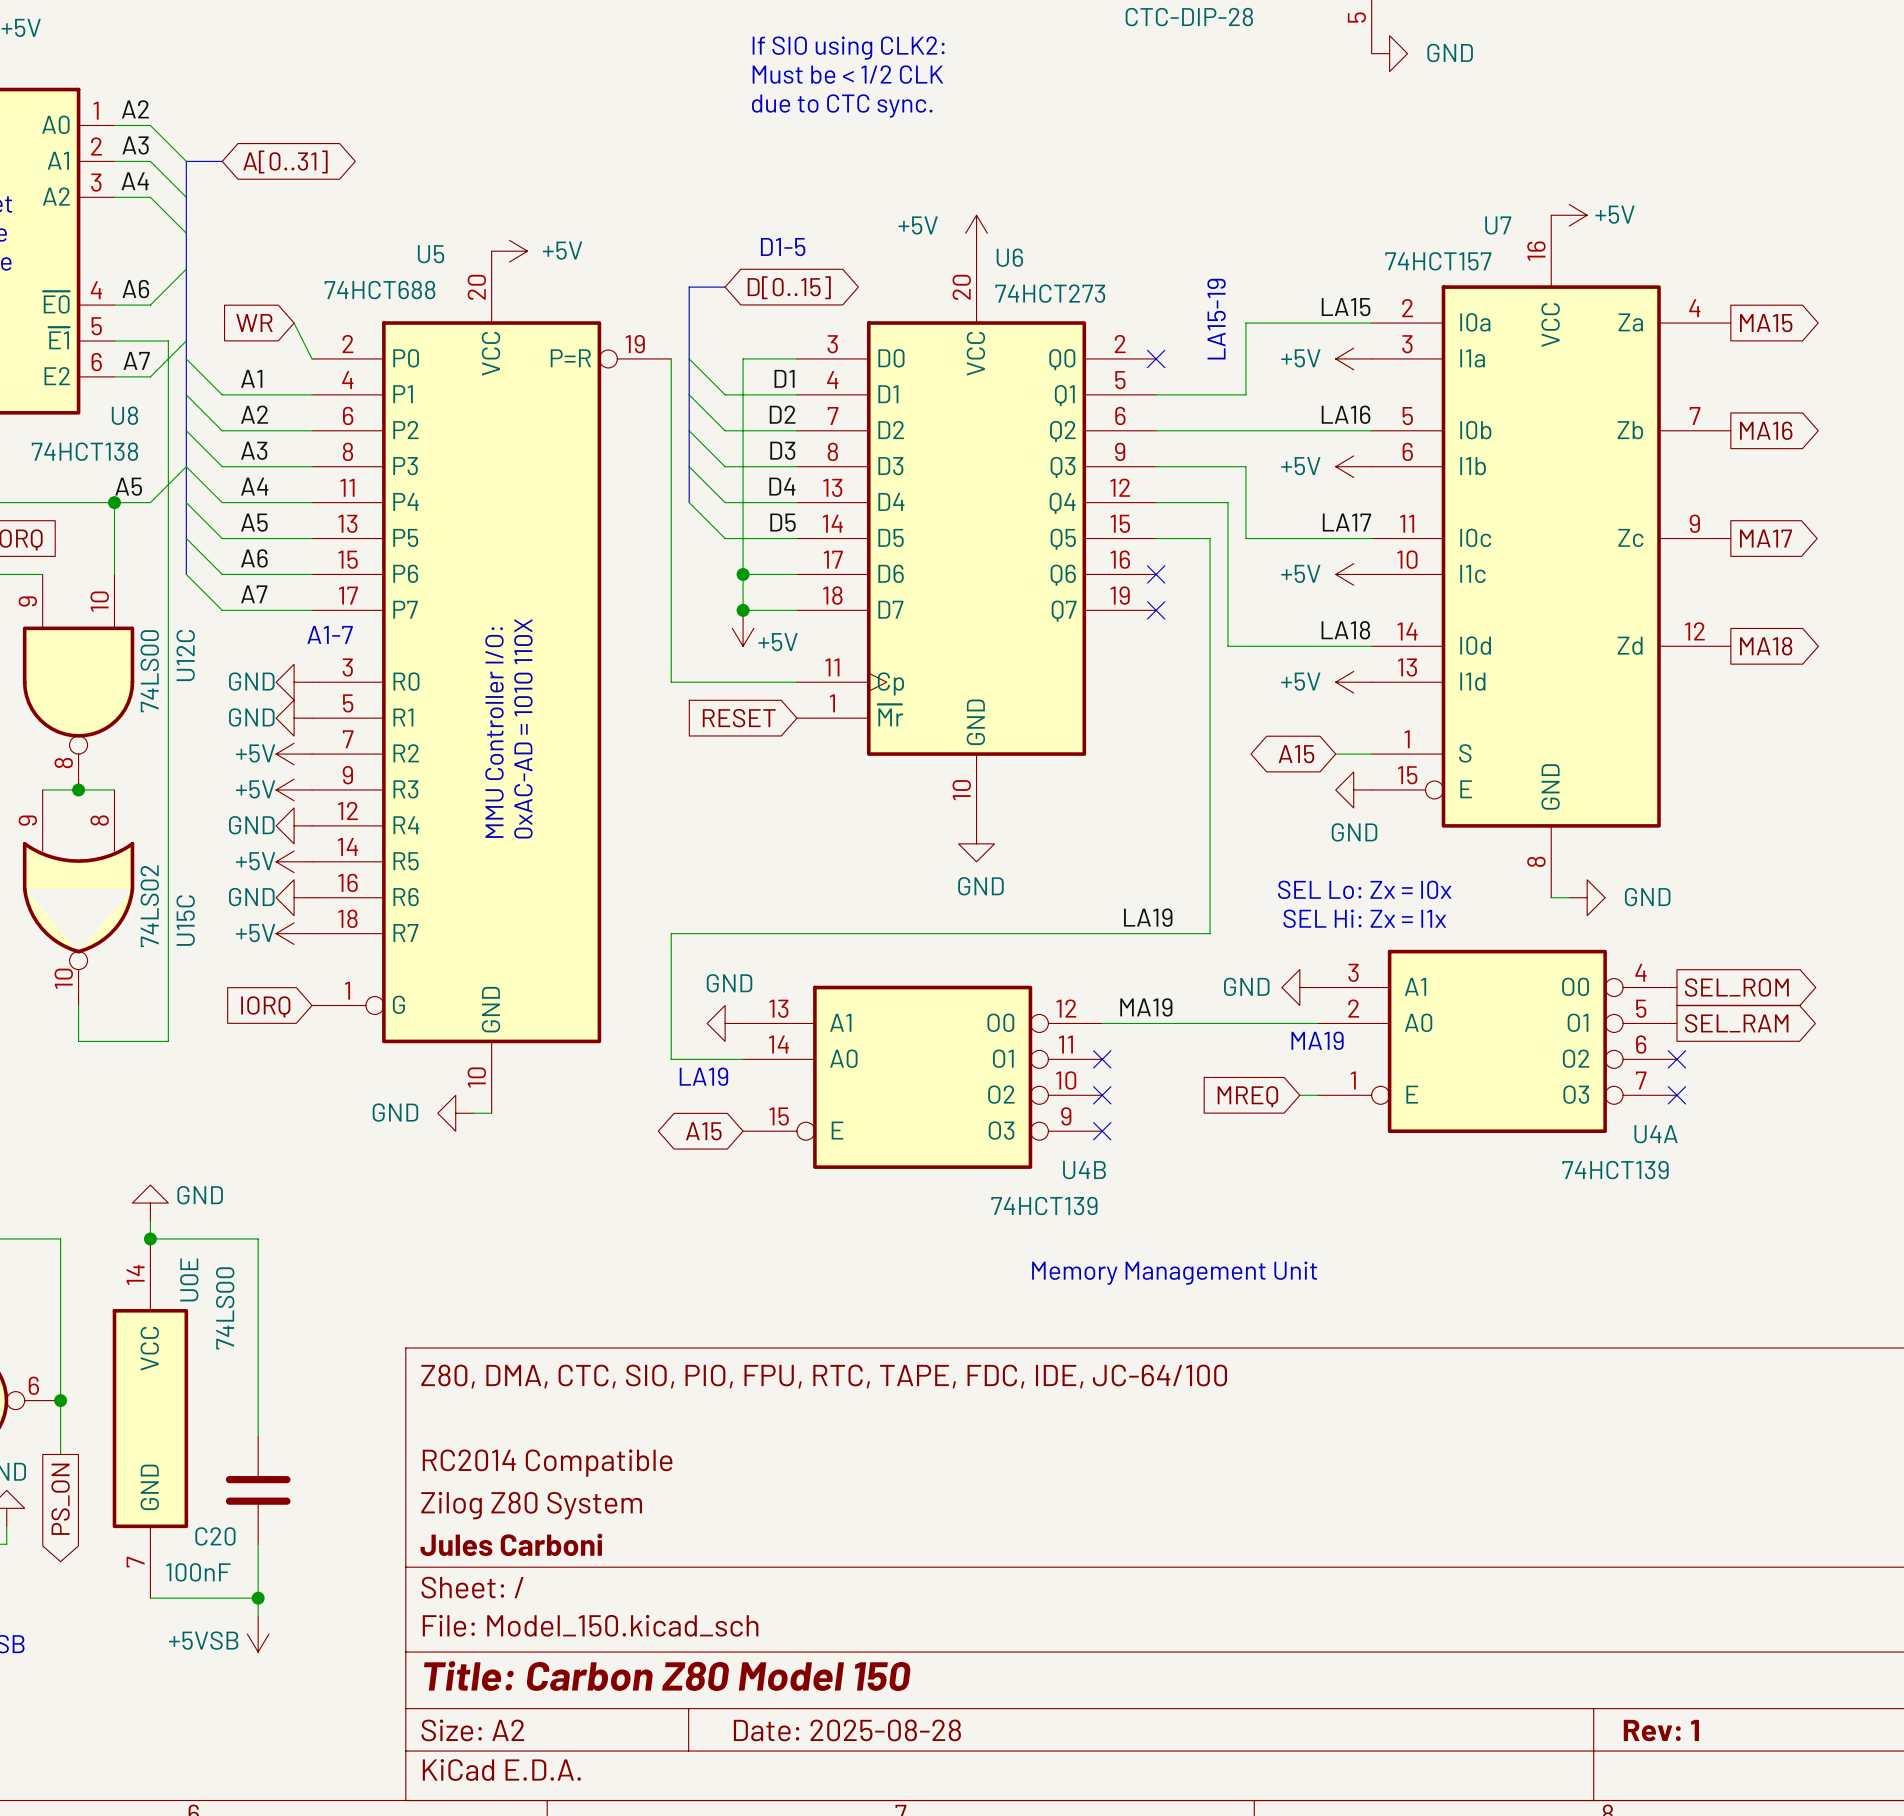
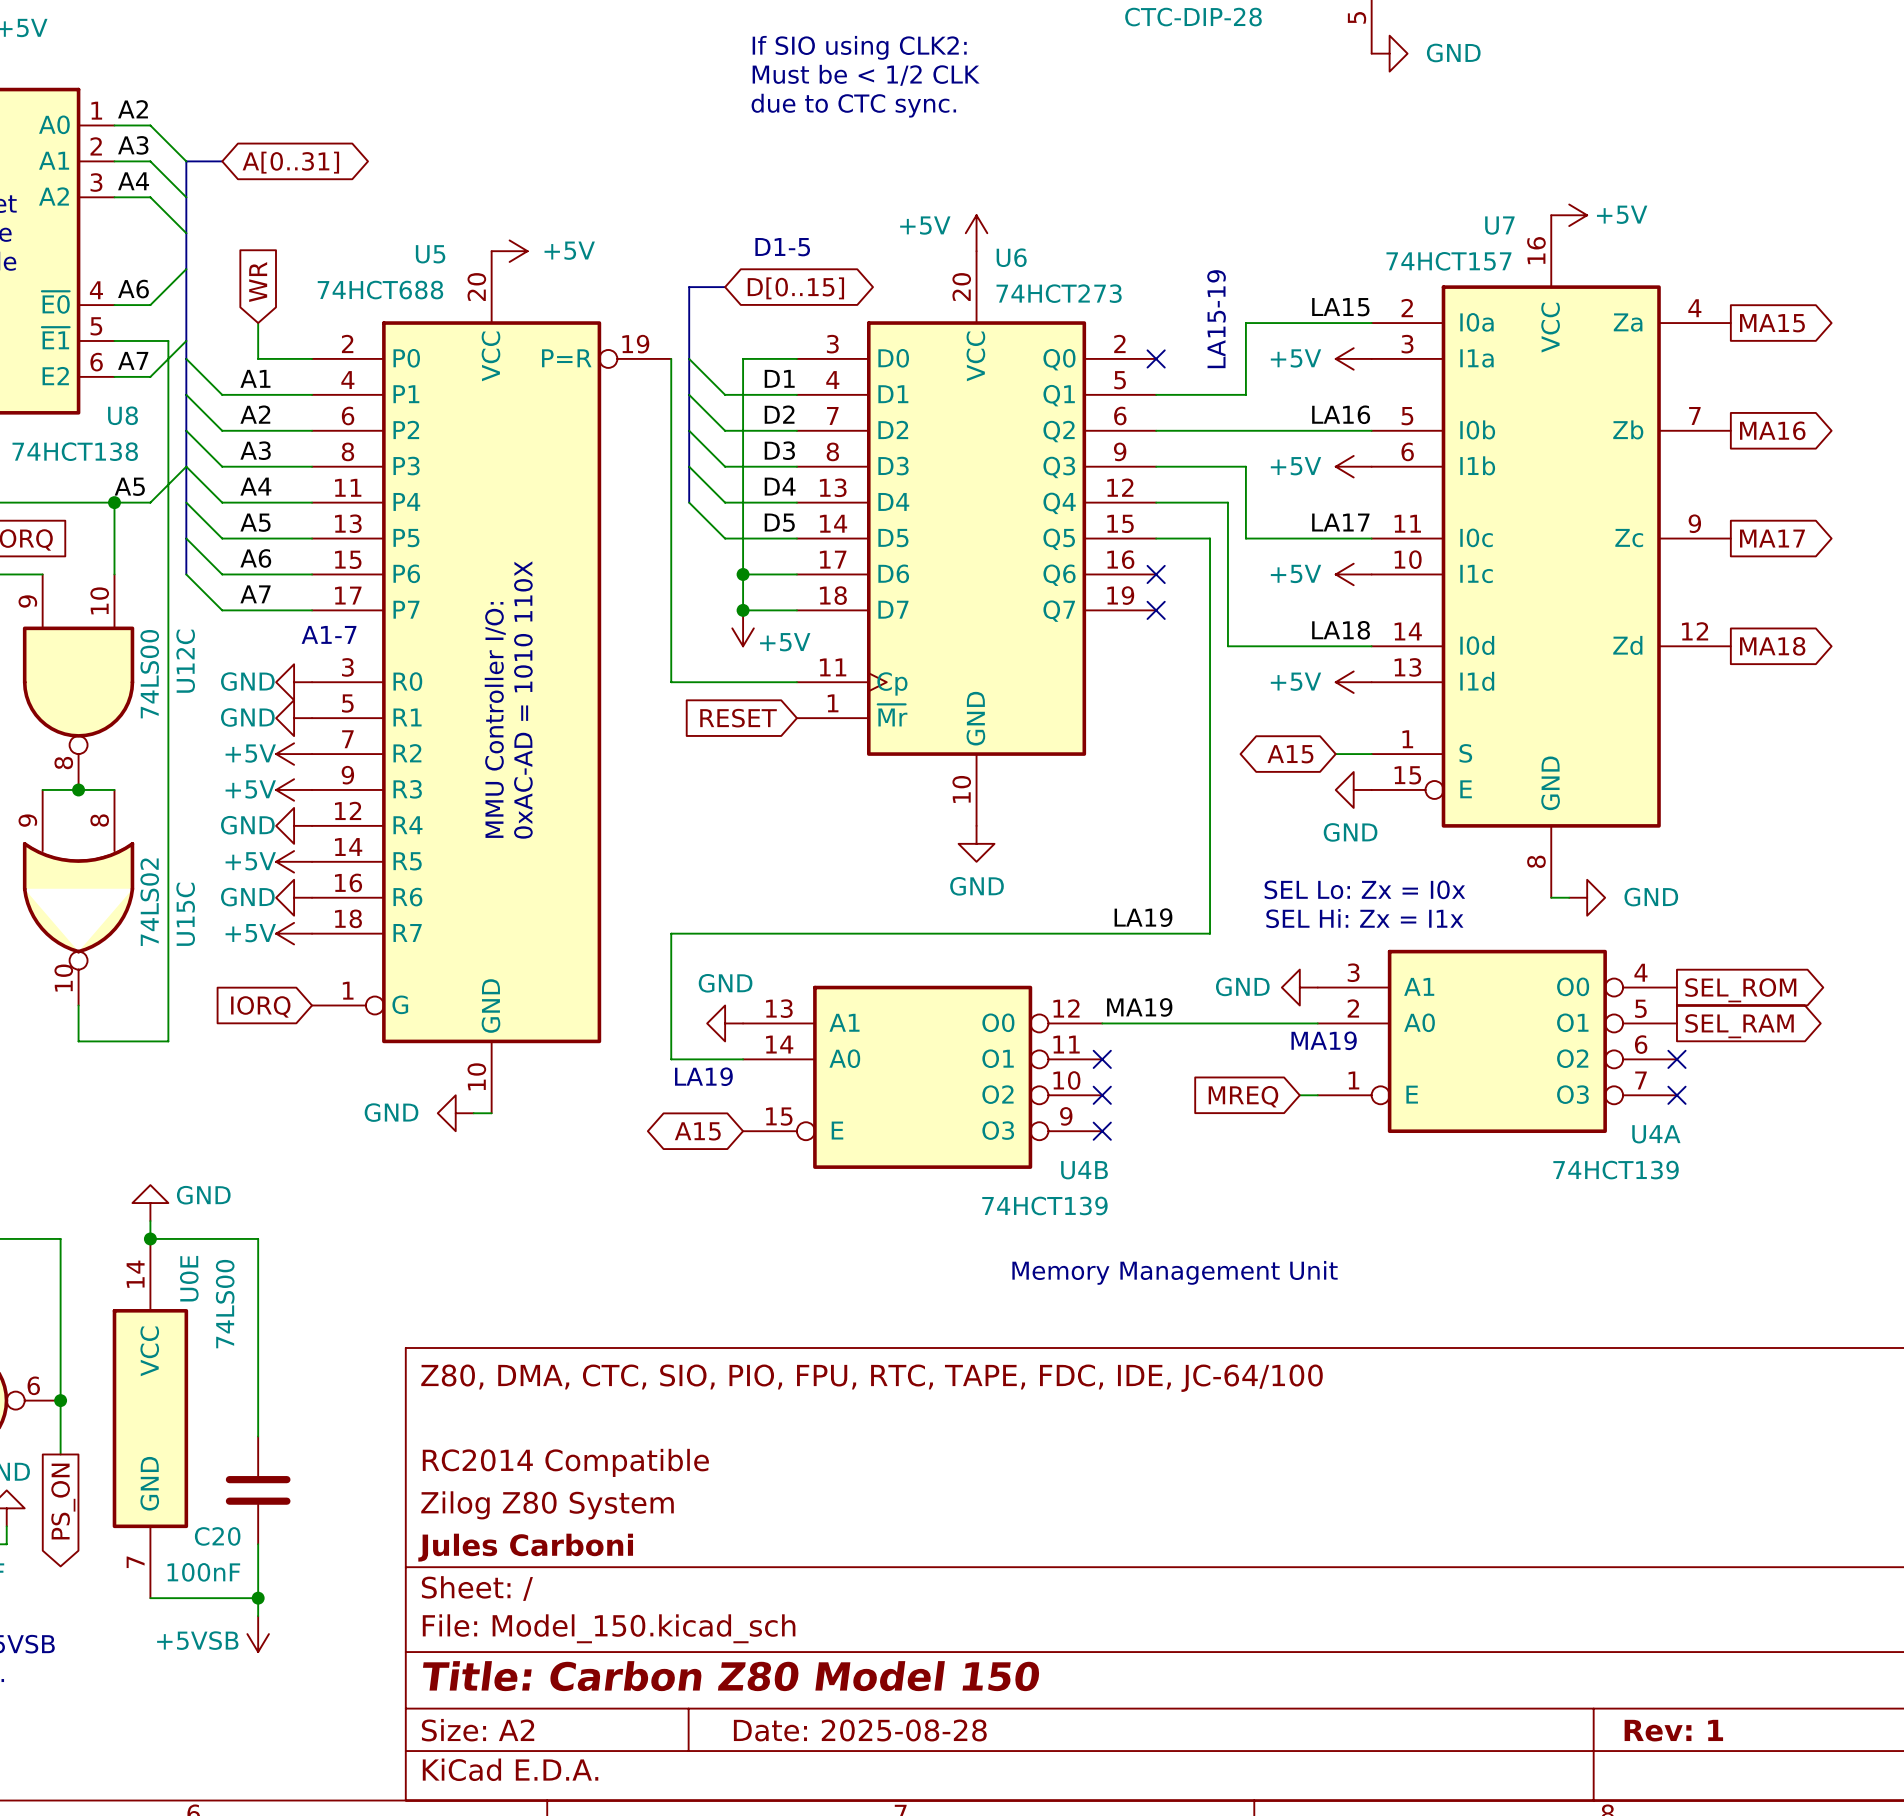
global label rotation: 0° (254, 323) -> 90° clockwise (258, 282)
wire: (294, 323) (312, 358) -> (258, 323) (258, 358) (312, 358)

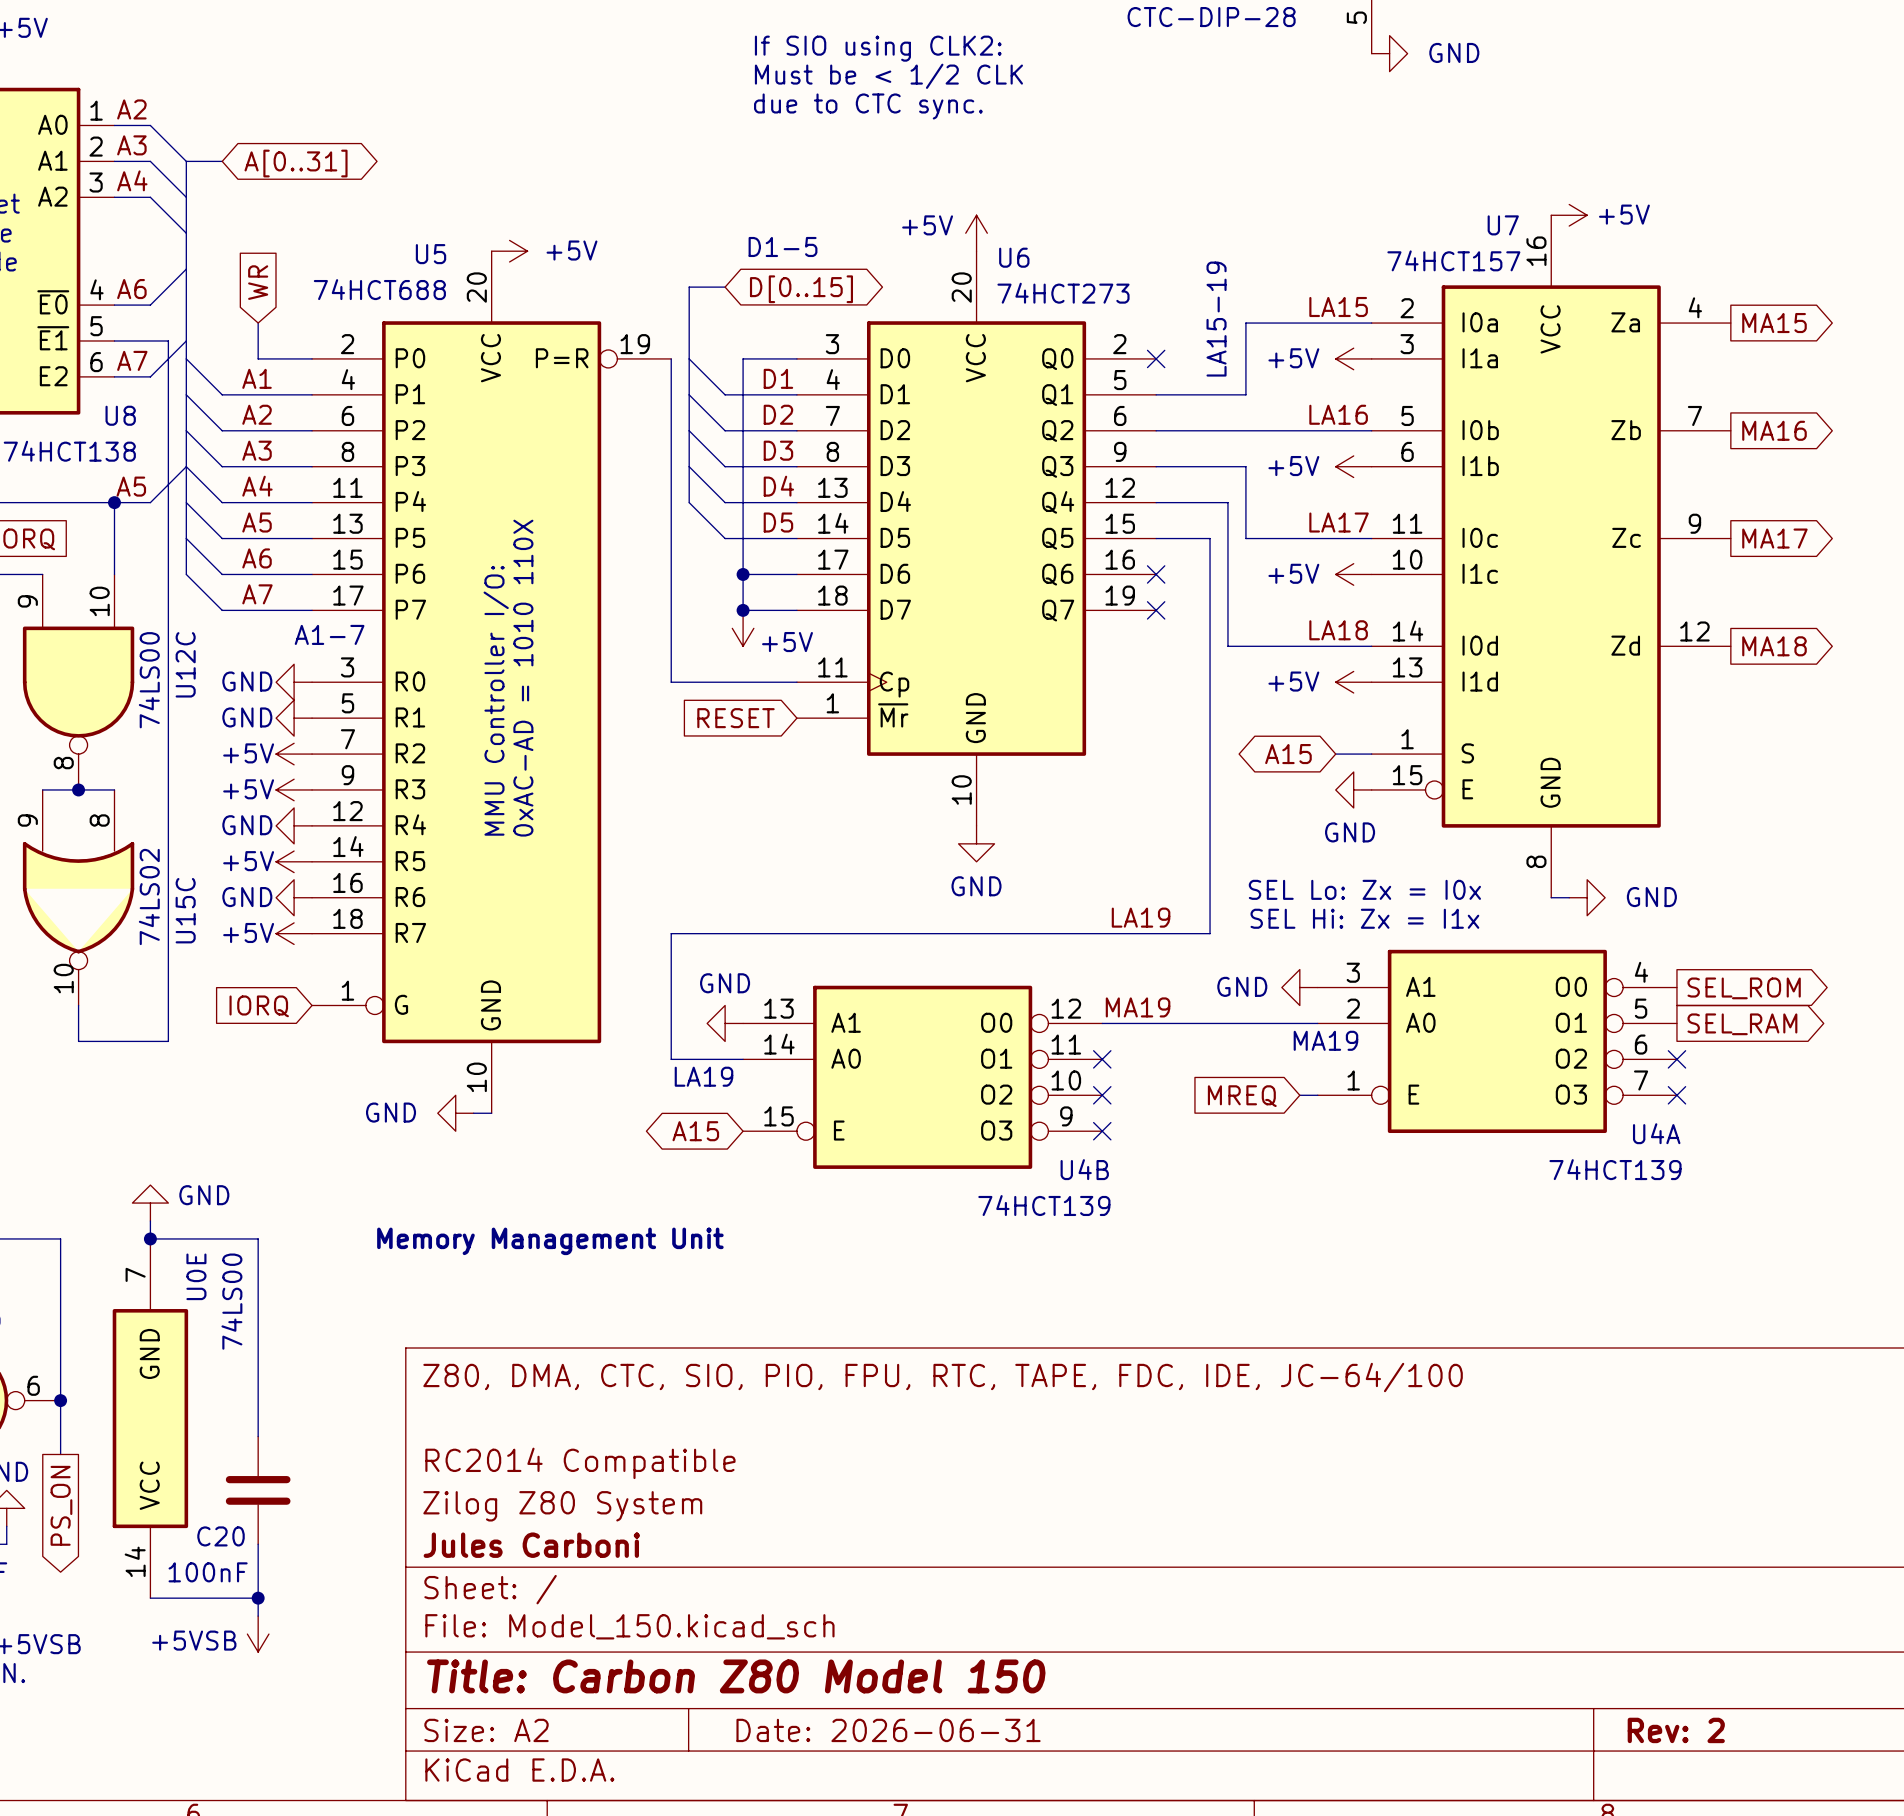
text: none -> Memory Management Unit (550, 1241)
text: Memory Management Unit (1175, 1272) -> none
U0E rotation: 0° (150, 1418) -> 180° (150, 1418)
title block: Date: 2025-08-28 (860, 1730) -> Date: 2026-06-31 (888, 1730)
title block: Rev: 1 (1673, 1730) -> Rev: 2 (1676, 1730)

